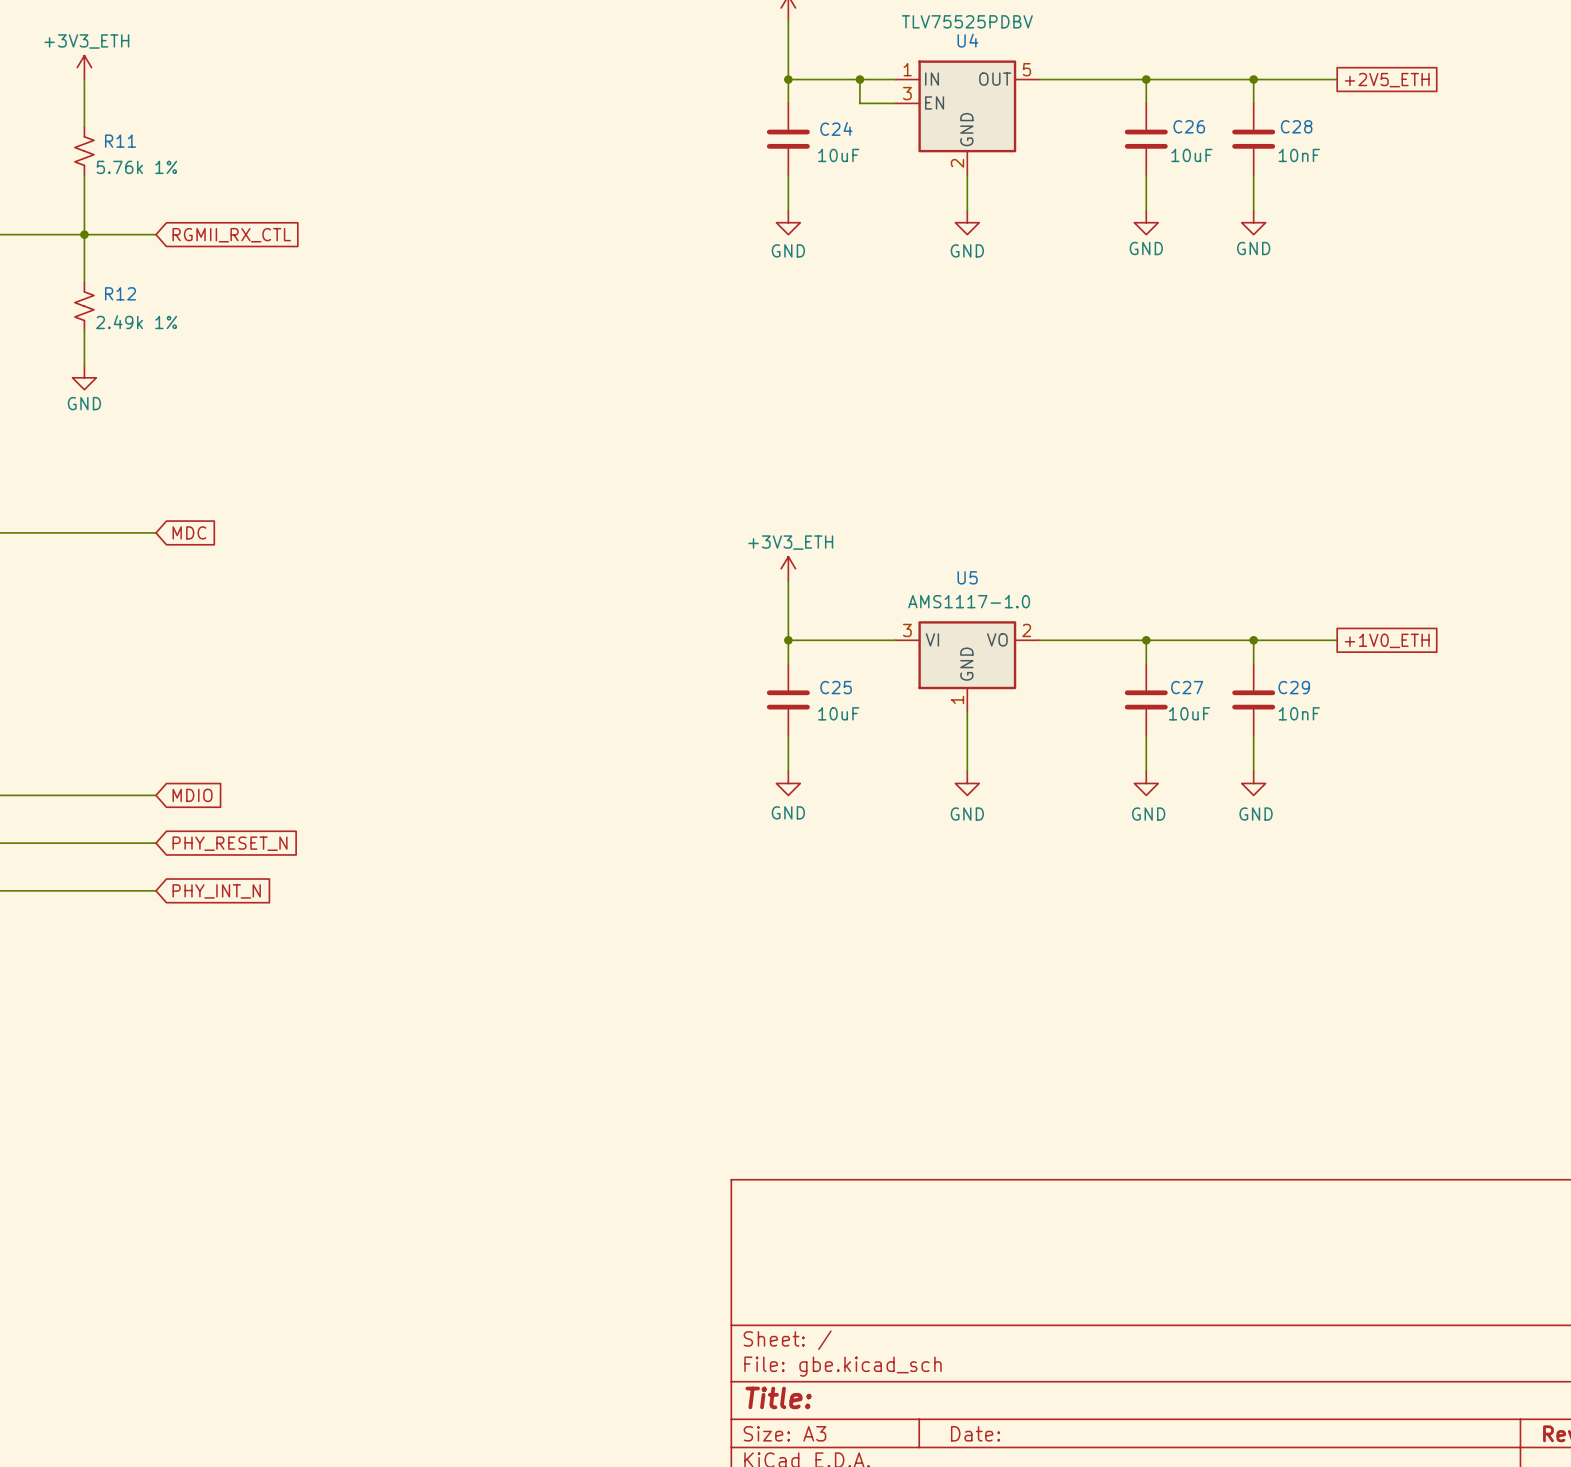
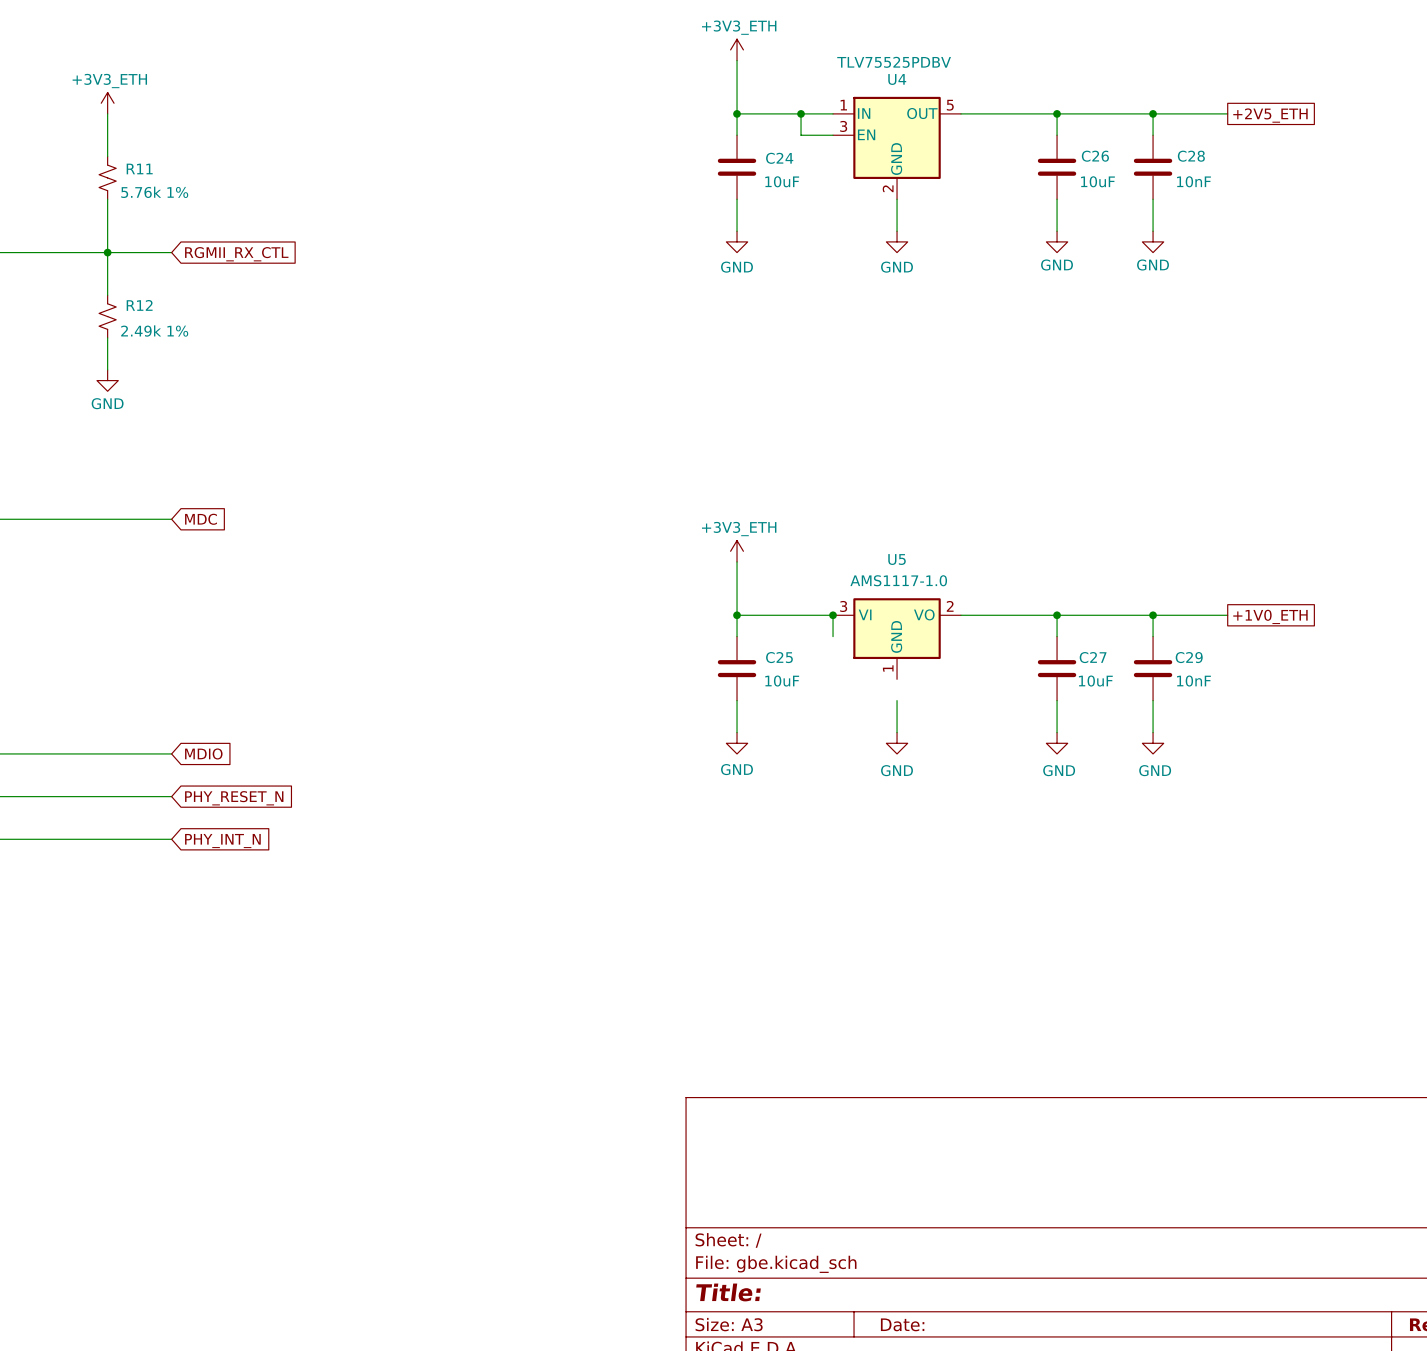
junction: none -> (833, 615)
wire: (967, 711) (967, 735) -> (833, 615) (833, 636)

